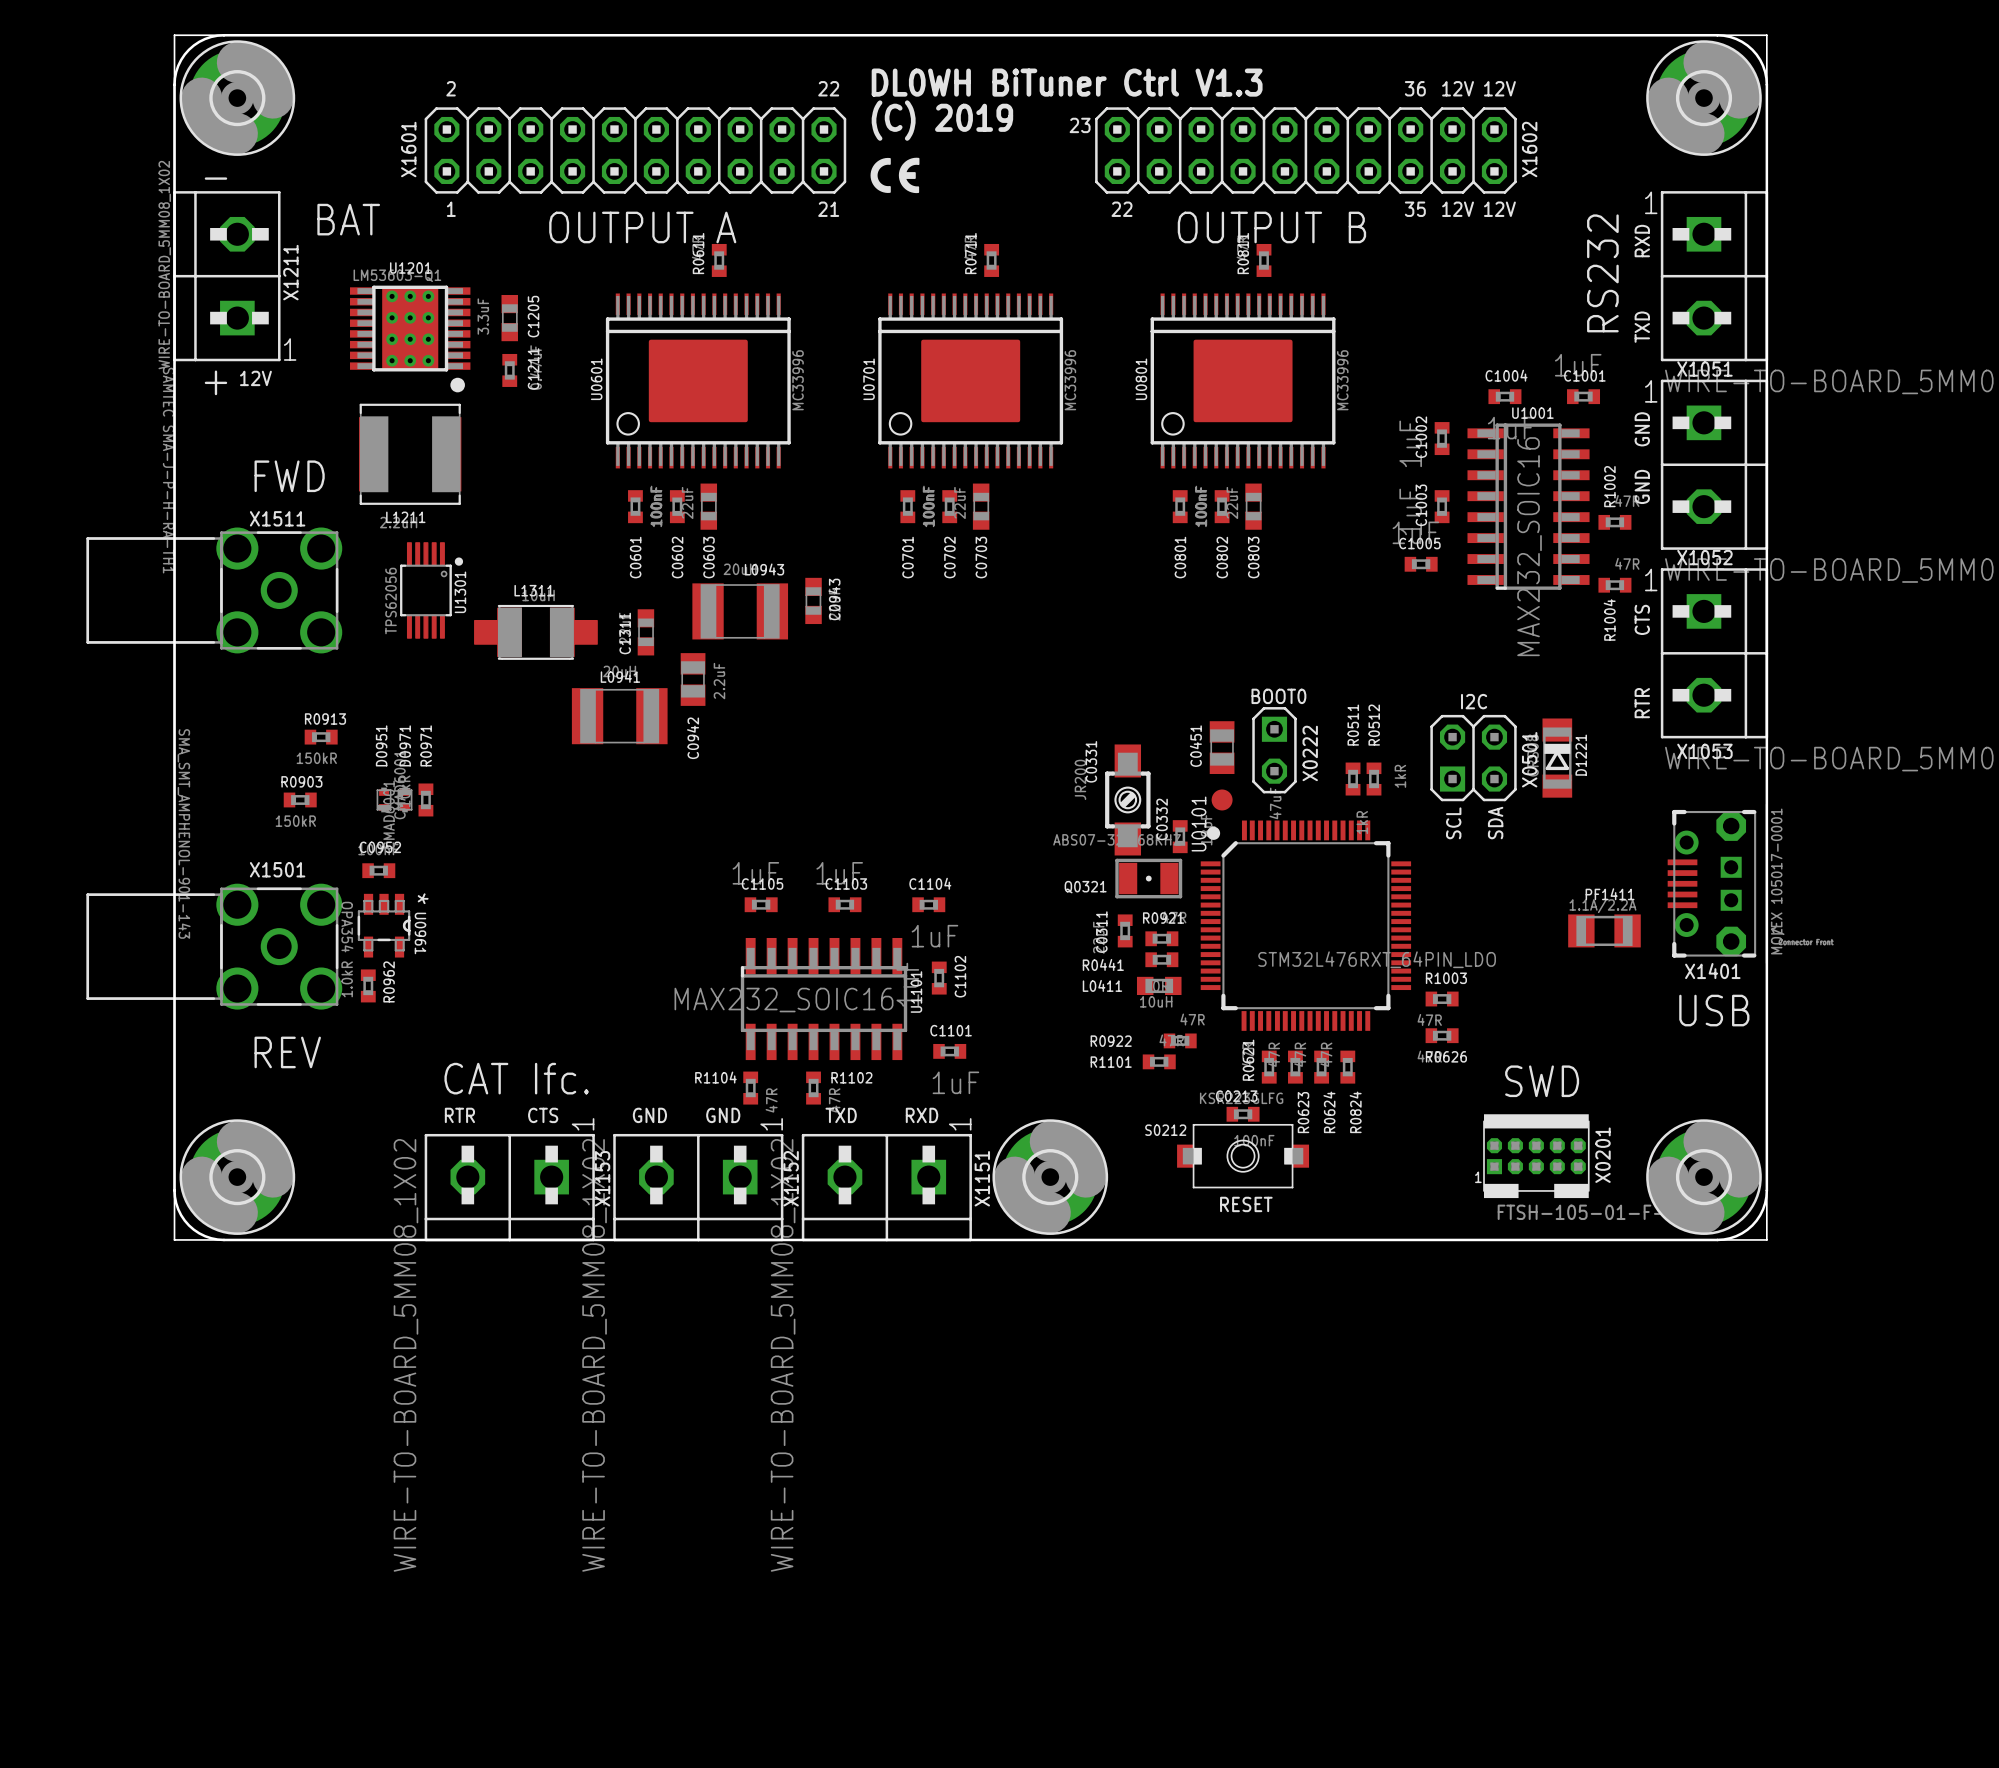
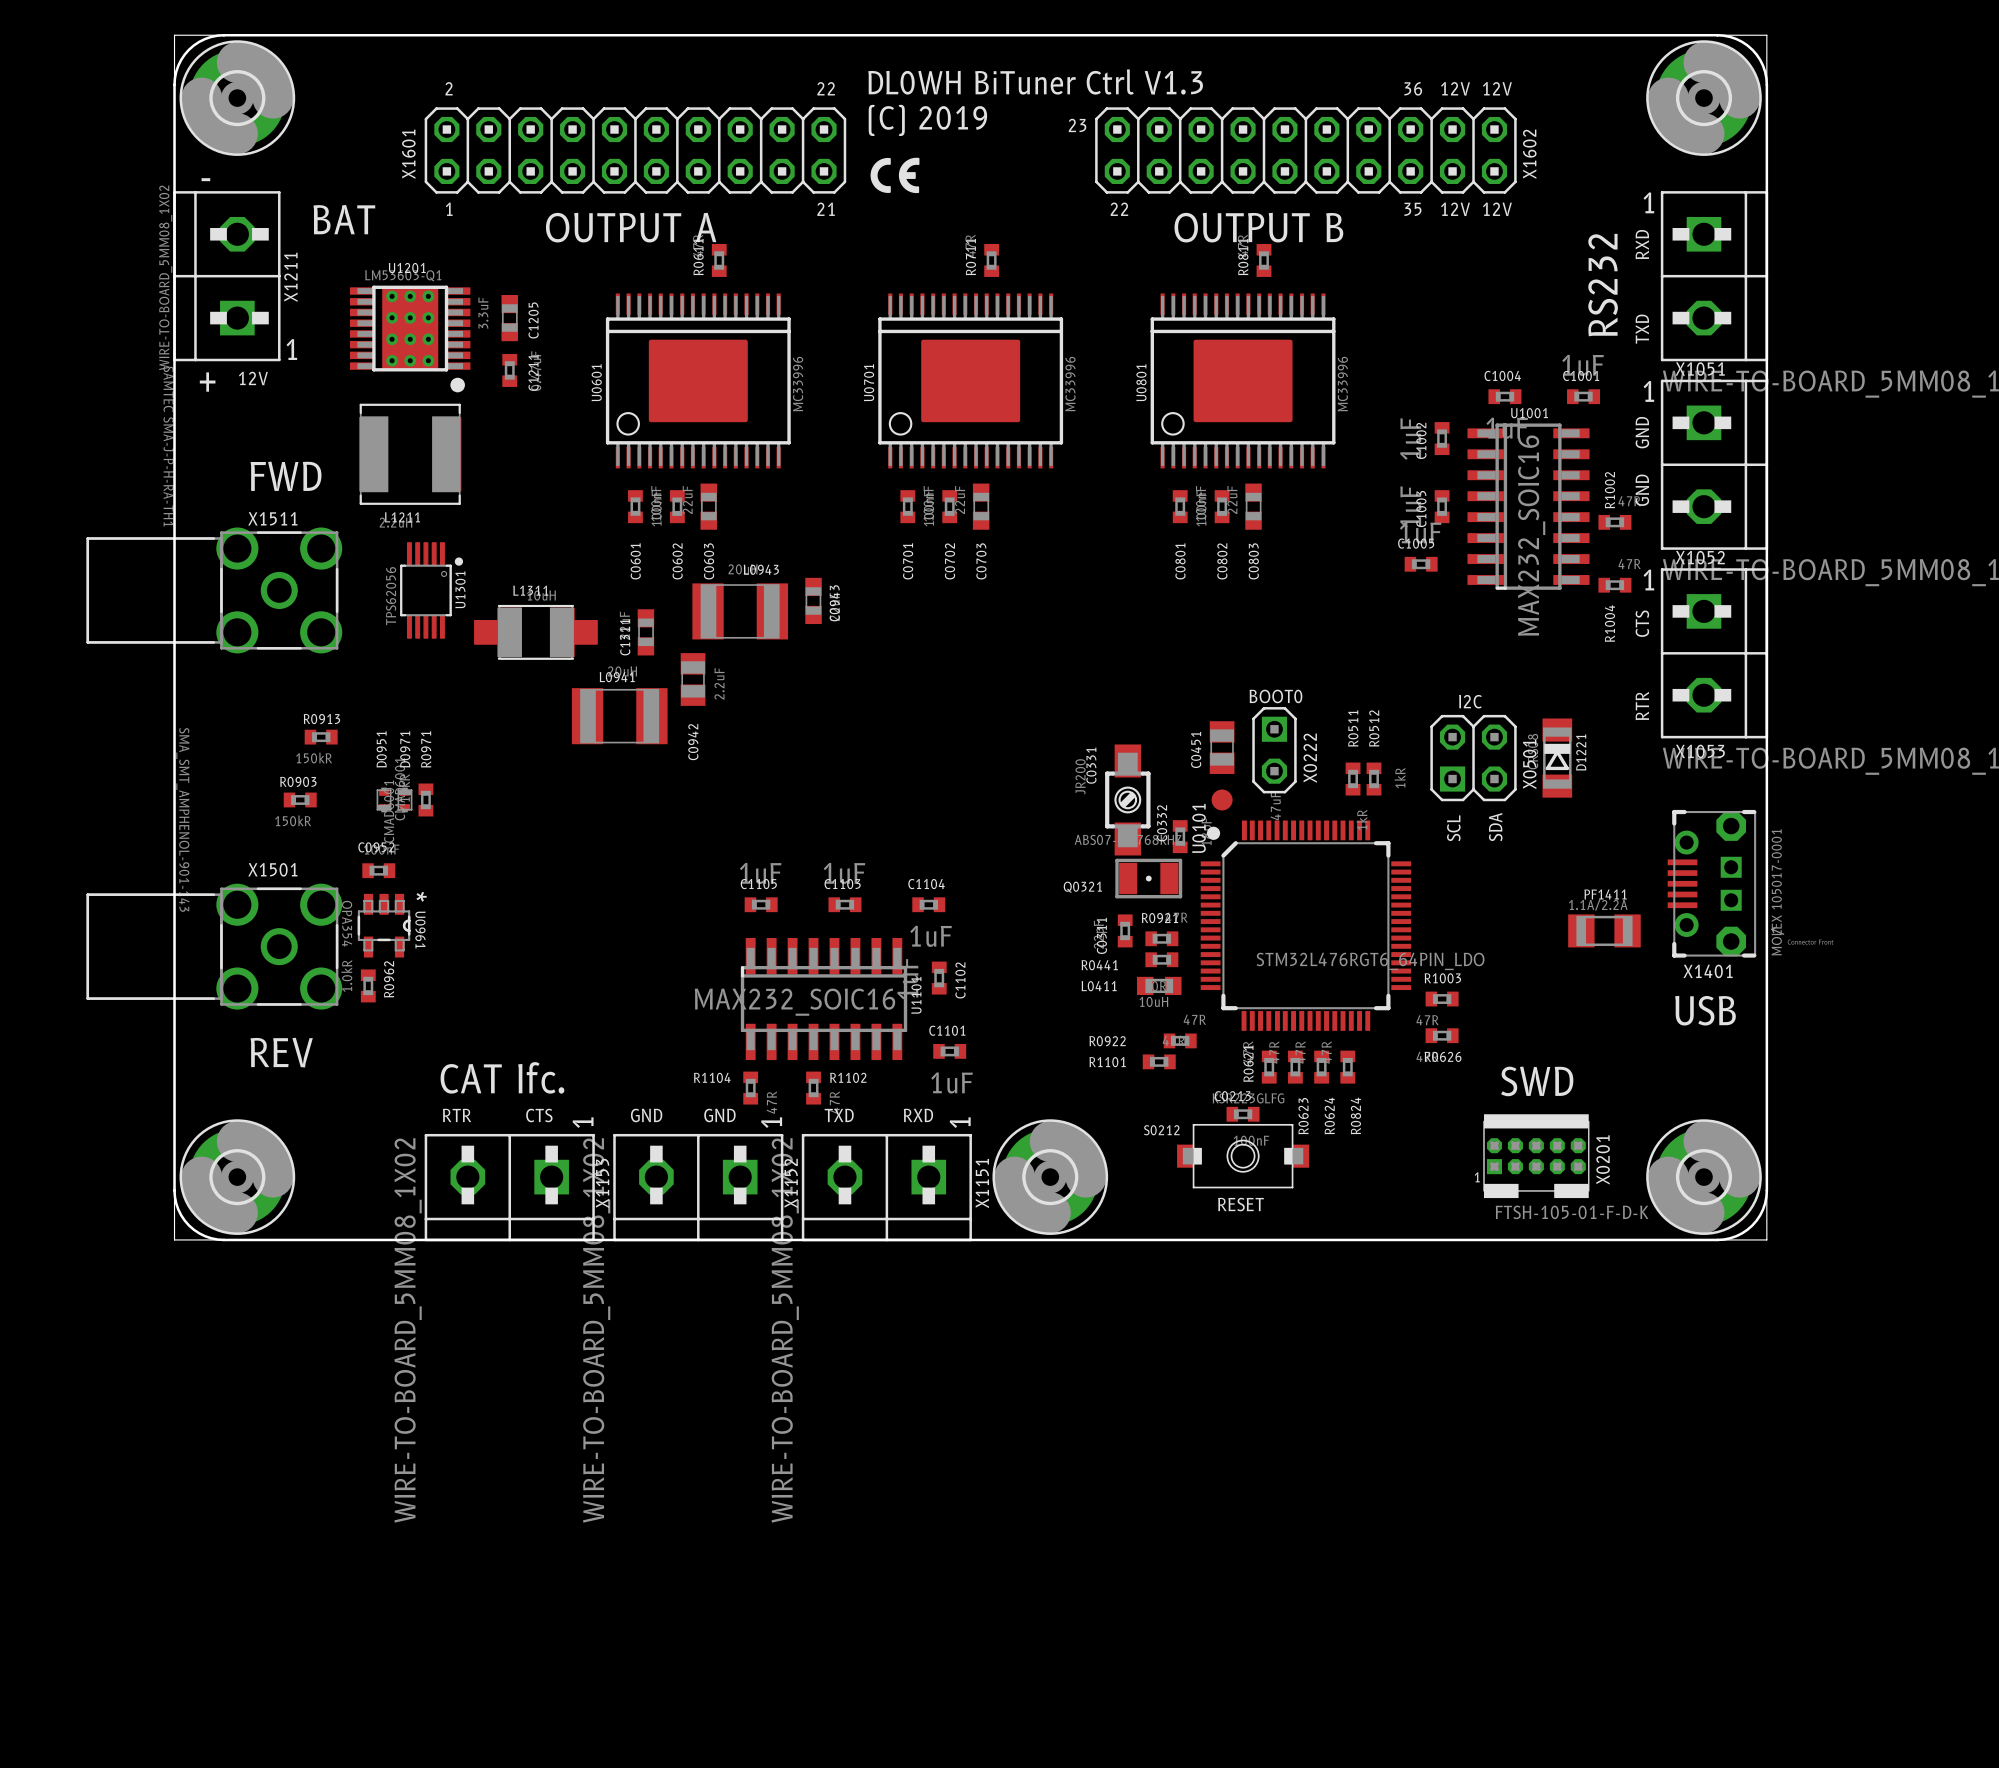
U0101 value: STM32L476RXT_64PIN_LDO (1377, 959) -> STM32L476RGT6_64PIN_LDO (1370, 961)

